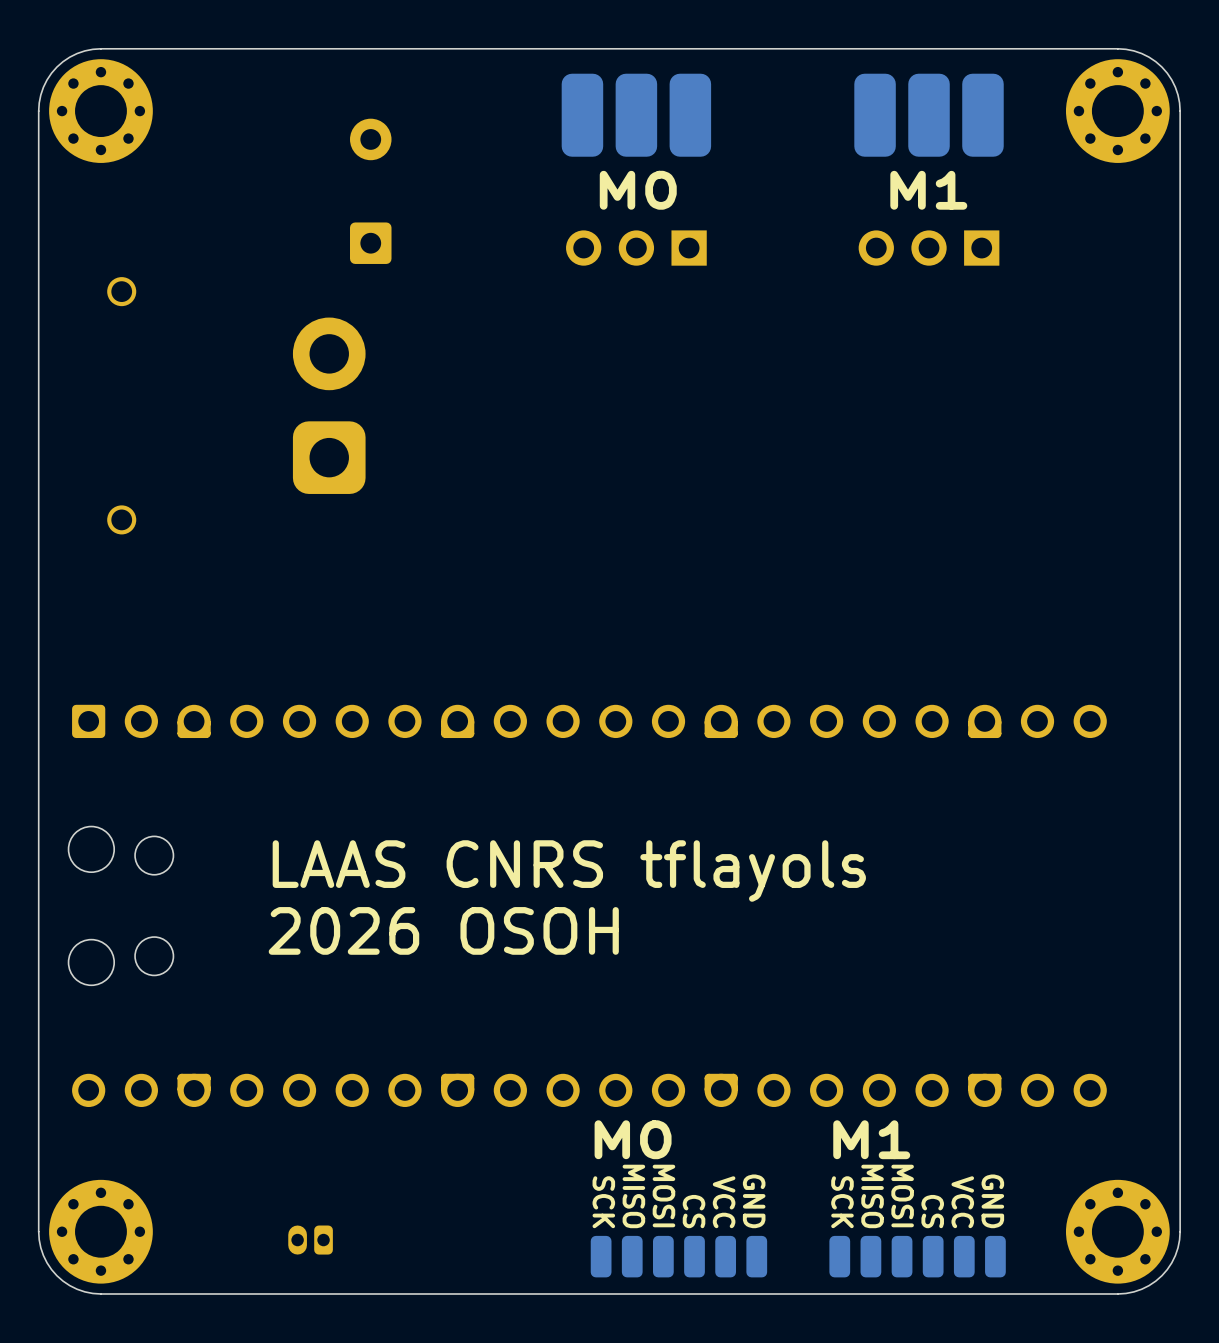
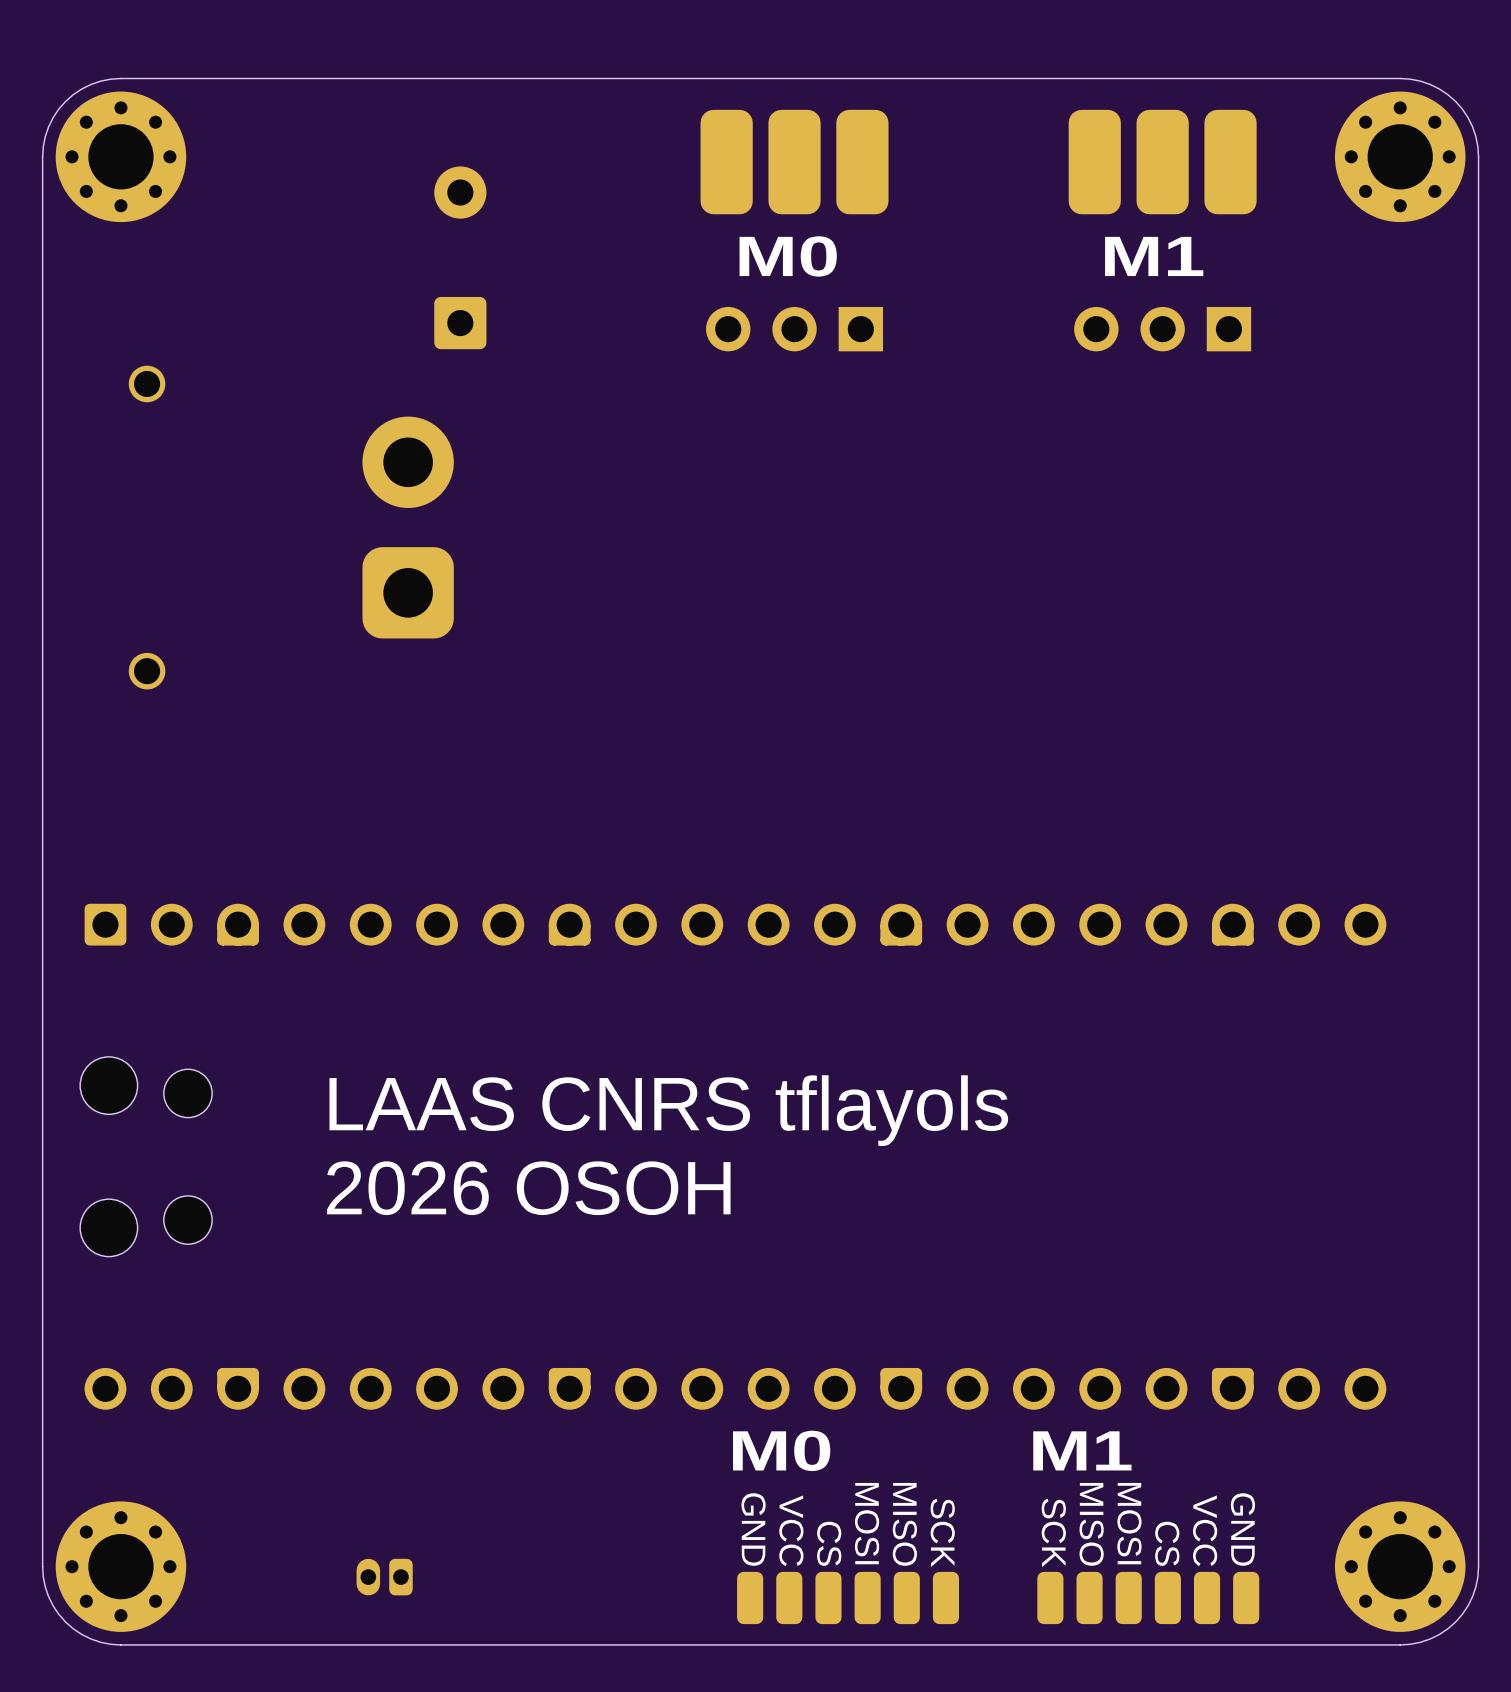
text: MISO (633, 1196) -> VCC (791, 1530)
text: MOSI (663, 1196) -> CS (829, 1543)
text: GND (754, 1201) -> SCK (942, 1532)
text: SCK (603, 1202) -> GND (753, 1529)
text: VCC (724, 1202) -> MISO (904, 1524)
text: CS (694, 1211) -> MOSI (867, 1523)

